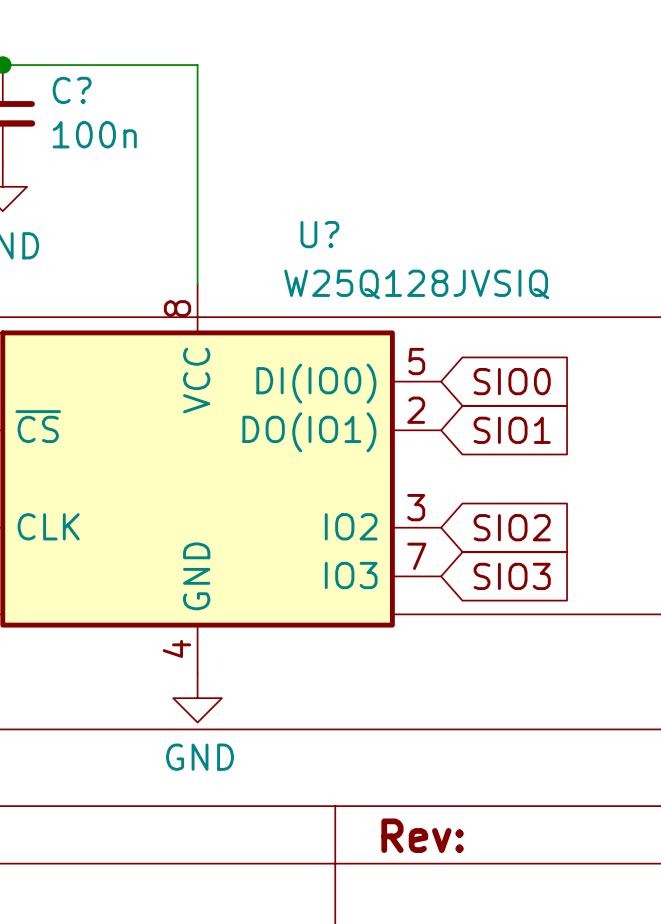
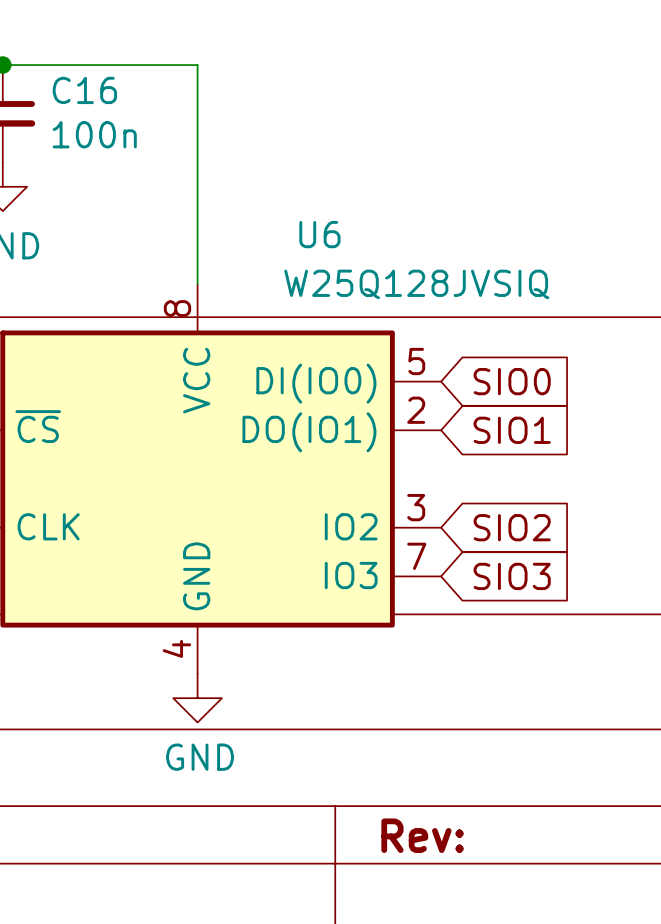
C? name: C? (72, 90) -> C16 (84, 90)
U? name: U? (319, 234) -> U6 (319, 234)

